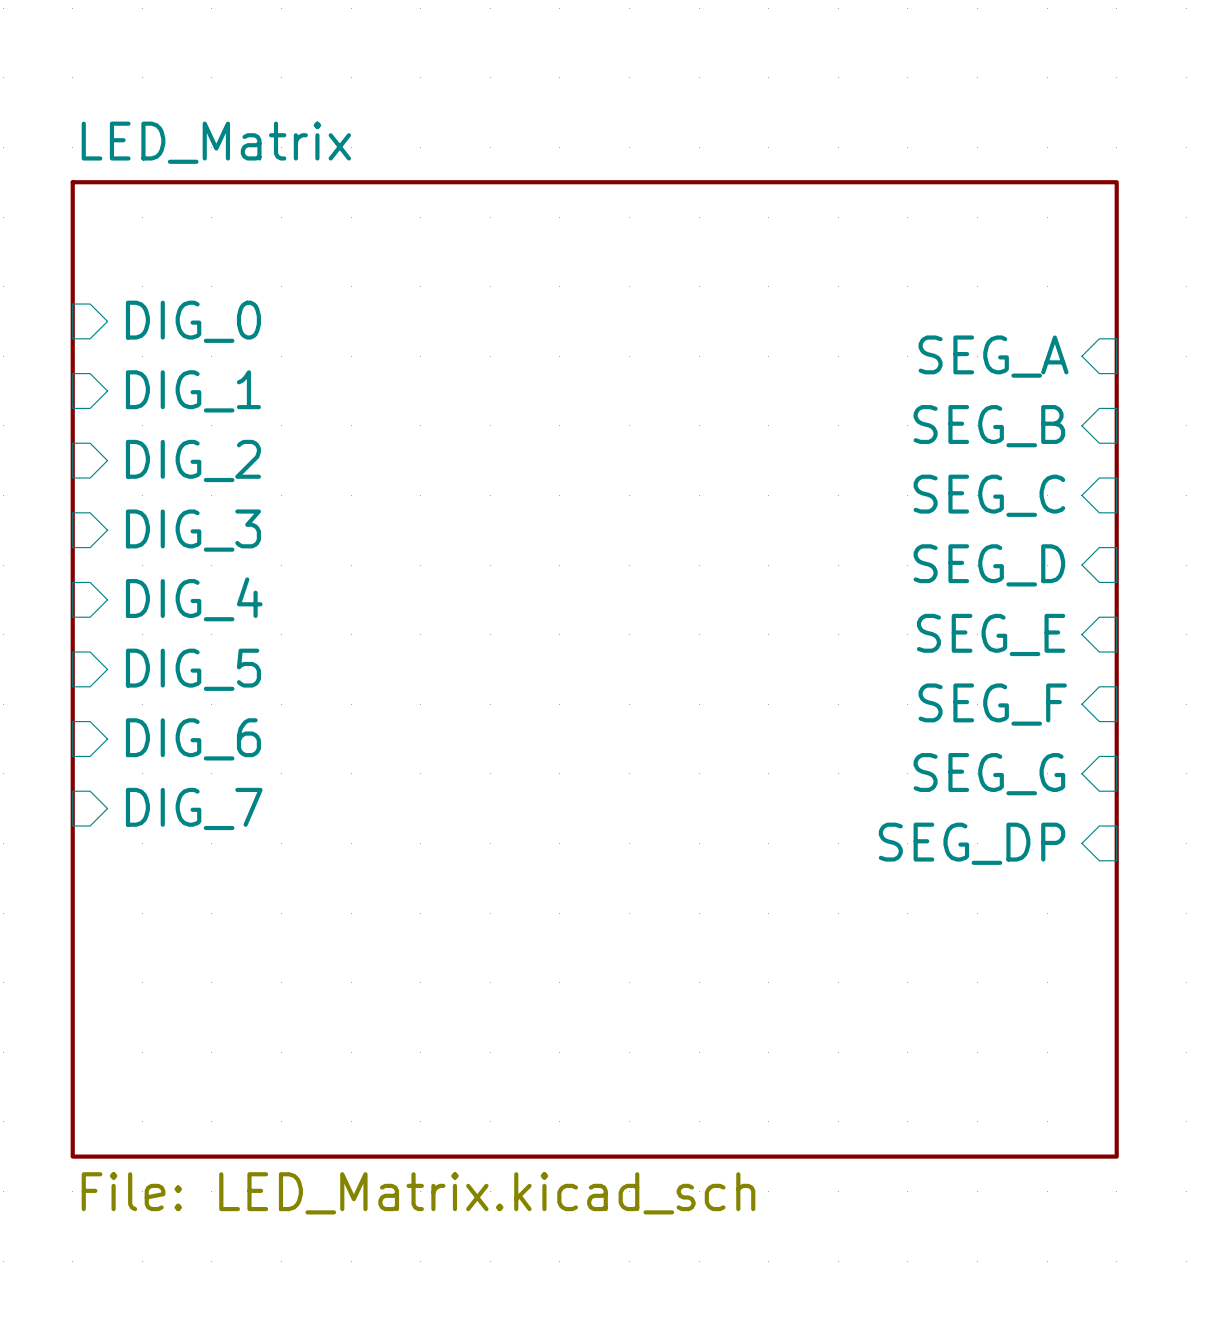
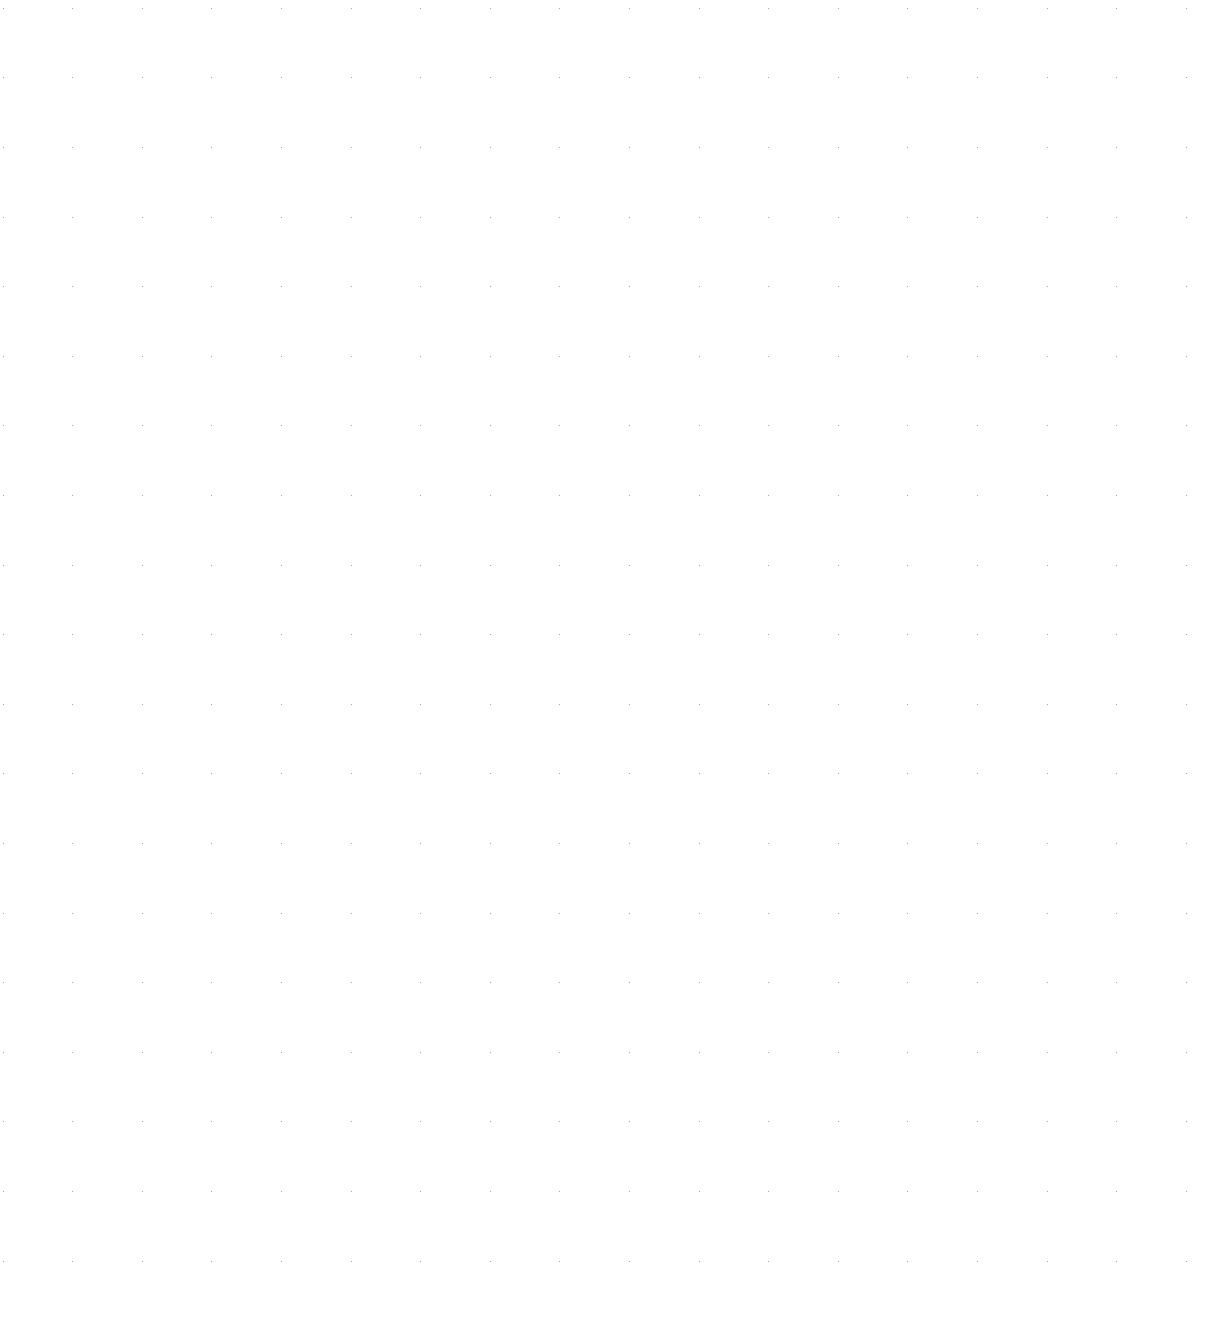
sheet pin: DIG_0 (193, 321) -> none
sheet pin: SEG_A (993, 356) -> none
sheet pin: DIG_1 (193, 391) -> none
sheet pin: SEG_B (989, 426) -> none
sheet pin: DIG_2 (193, 460) -> none
sheet pin: SEG_C (989, 495) -> none
sheet pin: DIG_3 (193, 530) -> none
sheet pin: SEG_D (989, 565) -> none
sheet pin: DIG_4 (194, 599) -> none
sheet pin: SEG_E (991, 634) -> none
sheet pin: DIG_5 (193, 669) -> none
sheet LED_Matrix: File: LED_Matrix.kicad_sch (594, 669) -> none
sheet pin: SEG_F (992, 704) -> none
sheet pin: DIG_6 (193, 739) -> none
sheet pin: SEG_G (989, 774) -> none
sheet pin: DIG_7 (194, 808) -> none
sheet pin: SEG_DP (972, 843) -> none

